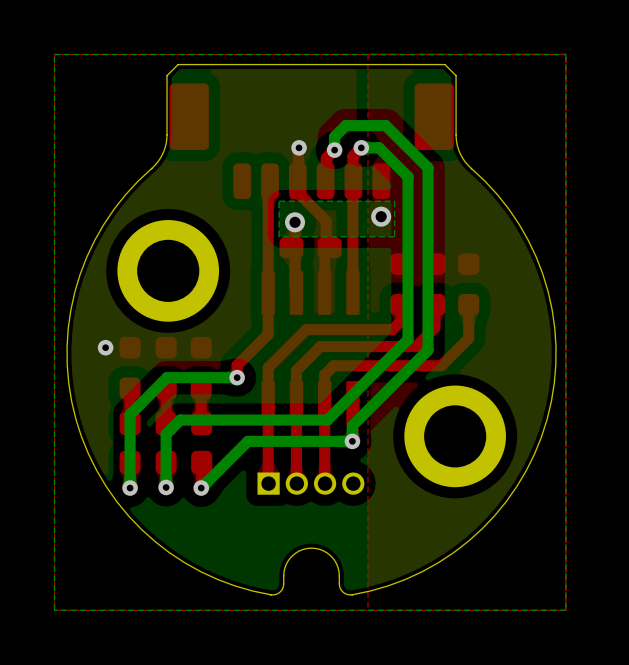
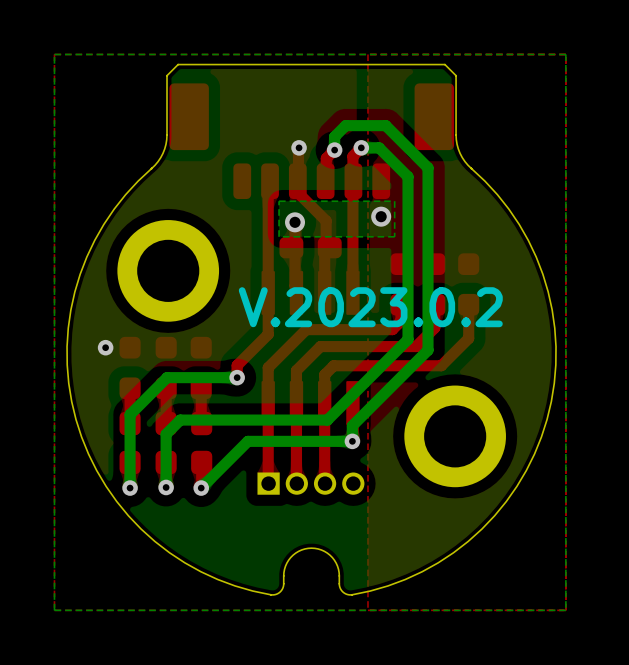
text: none -> V.2023.0.2 (370, 307)

